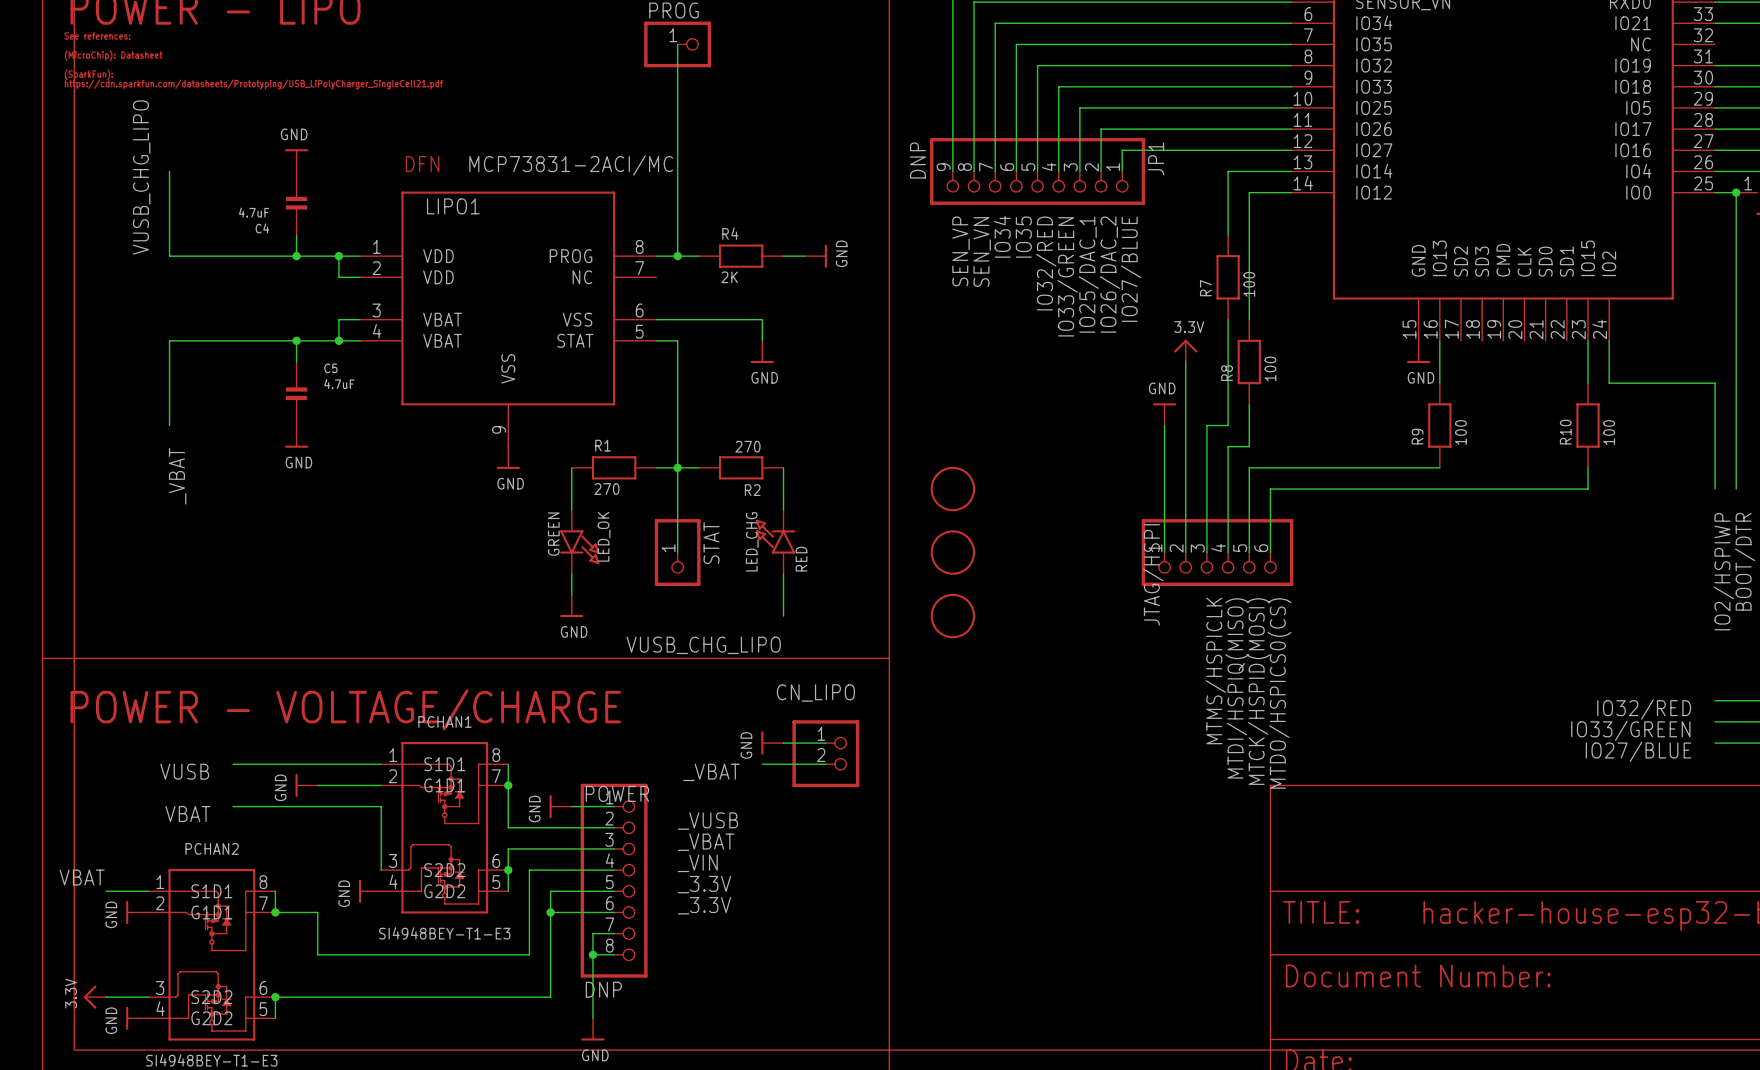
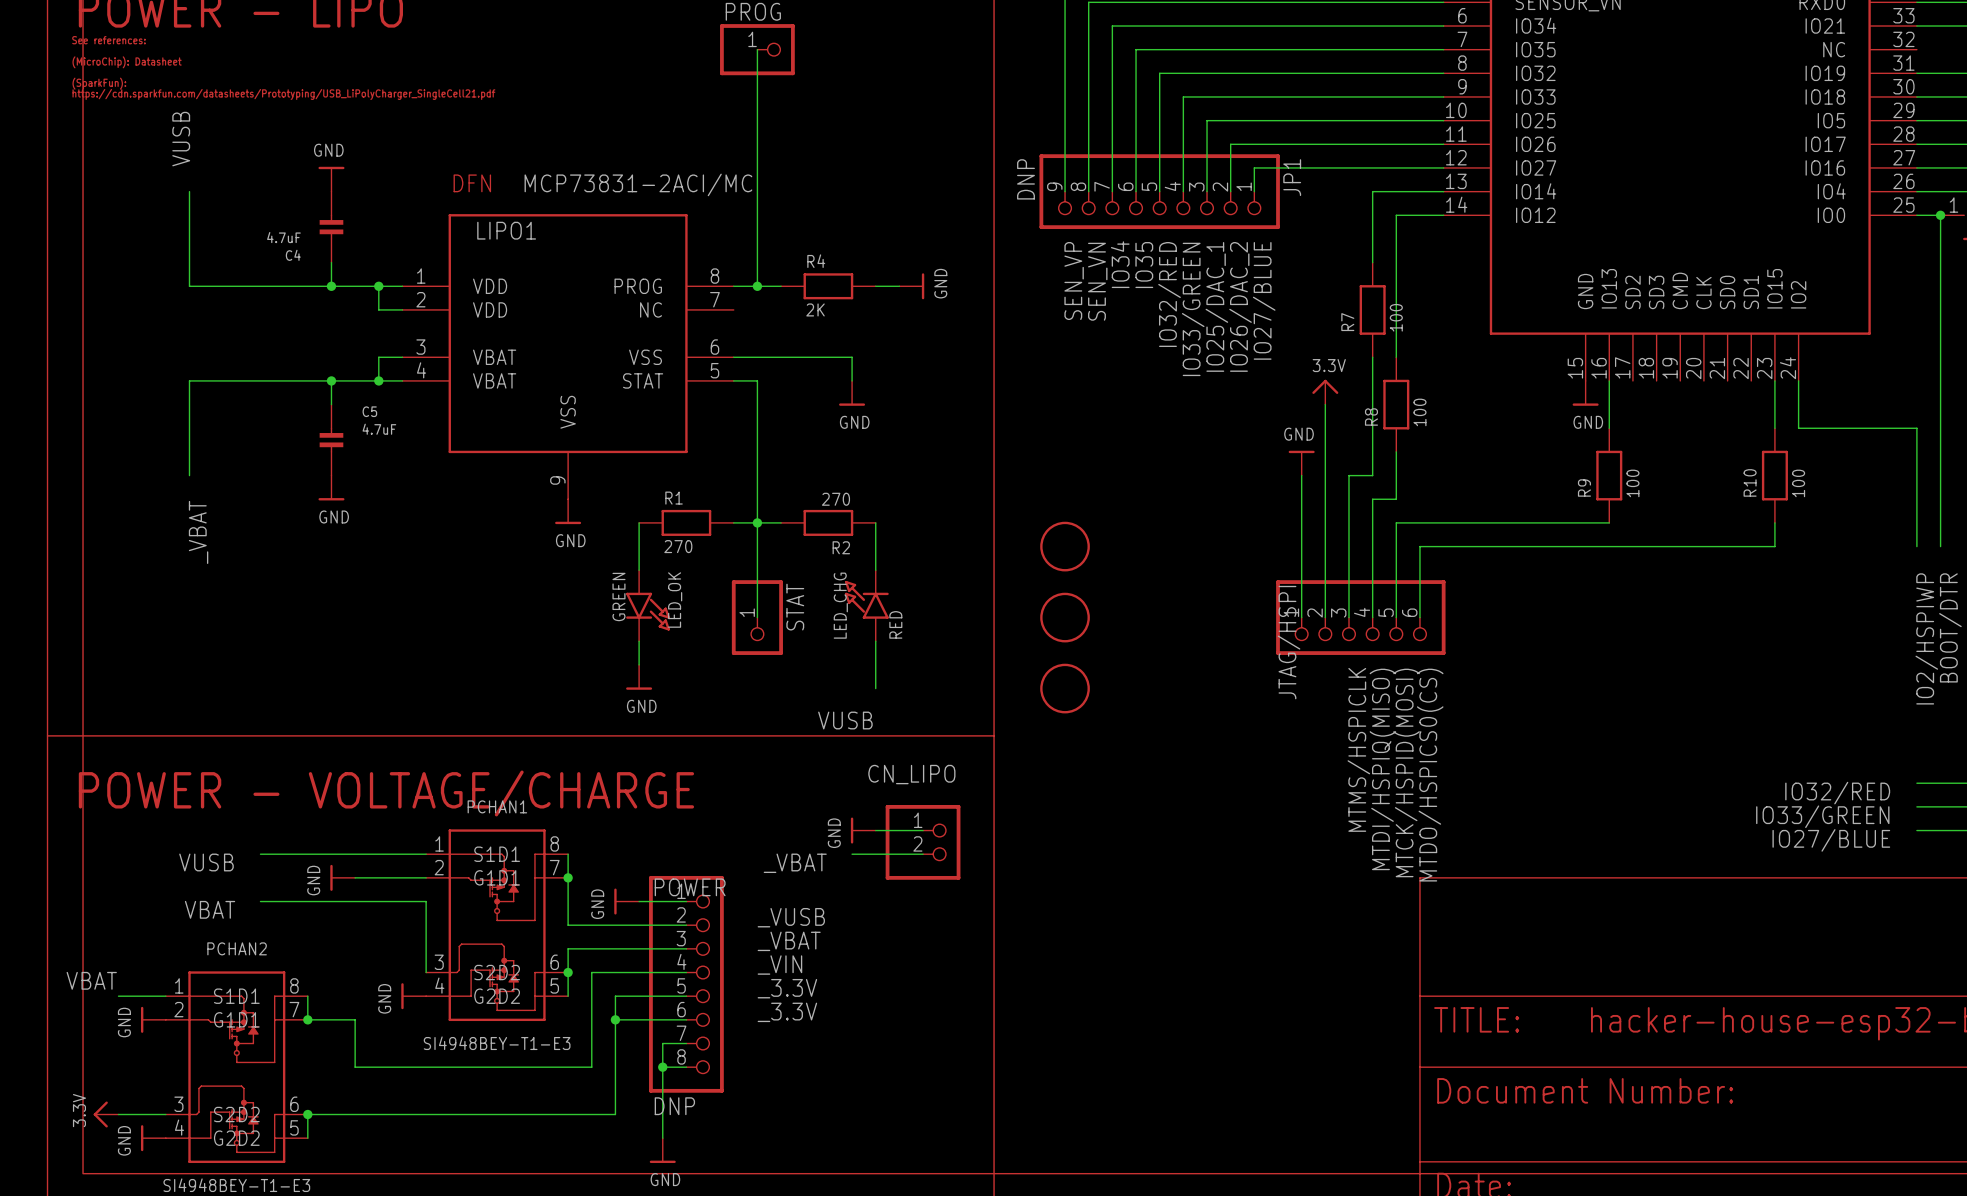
label: none -> VUSB (181, 139)
label: VUSB_CHG_LIPO (141, 177) -> none
label: VUSB_CHG_LIPO (703, 645) -> VUSB (845, 720)

